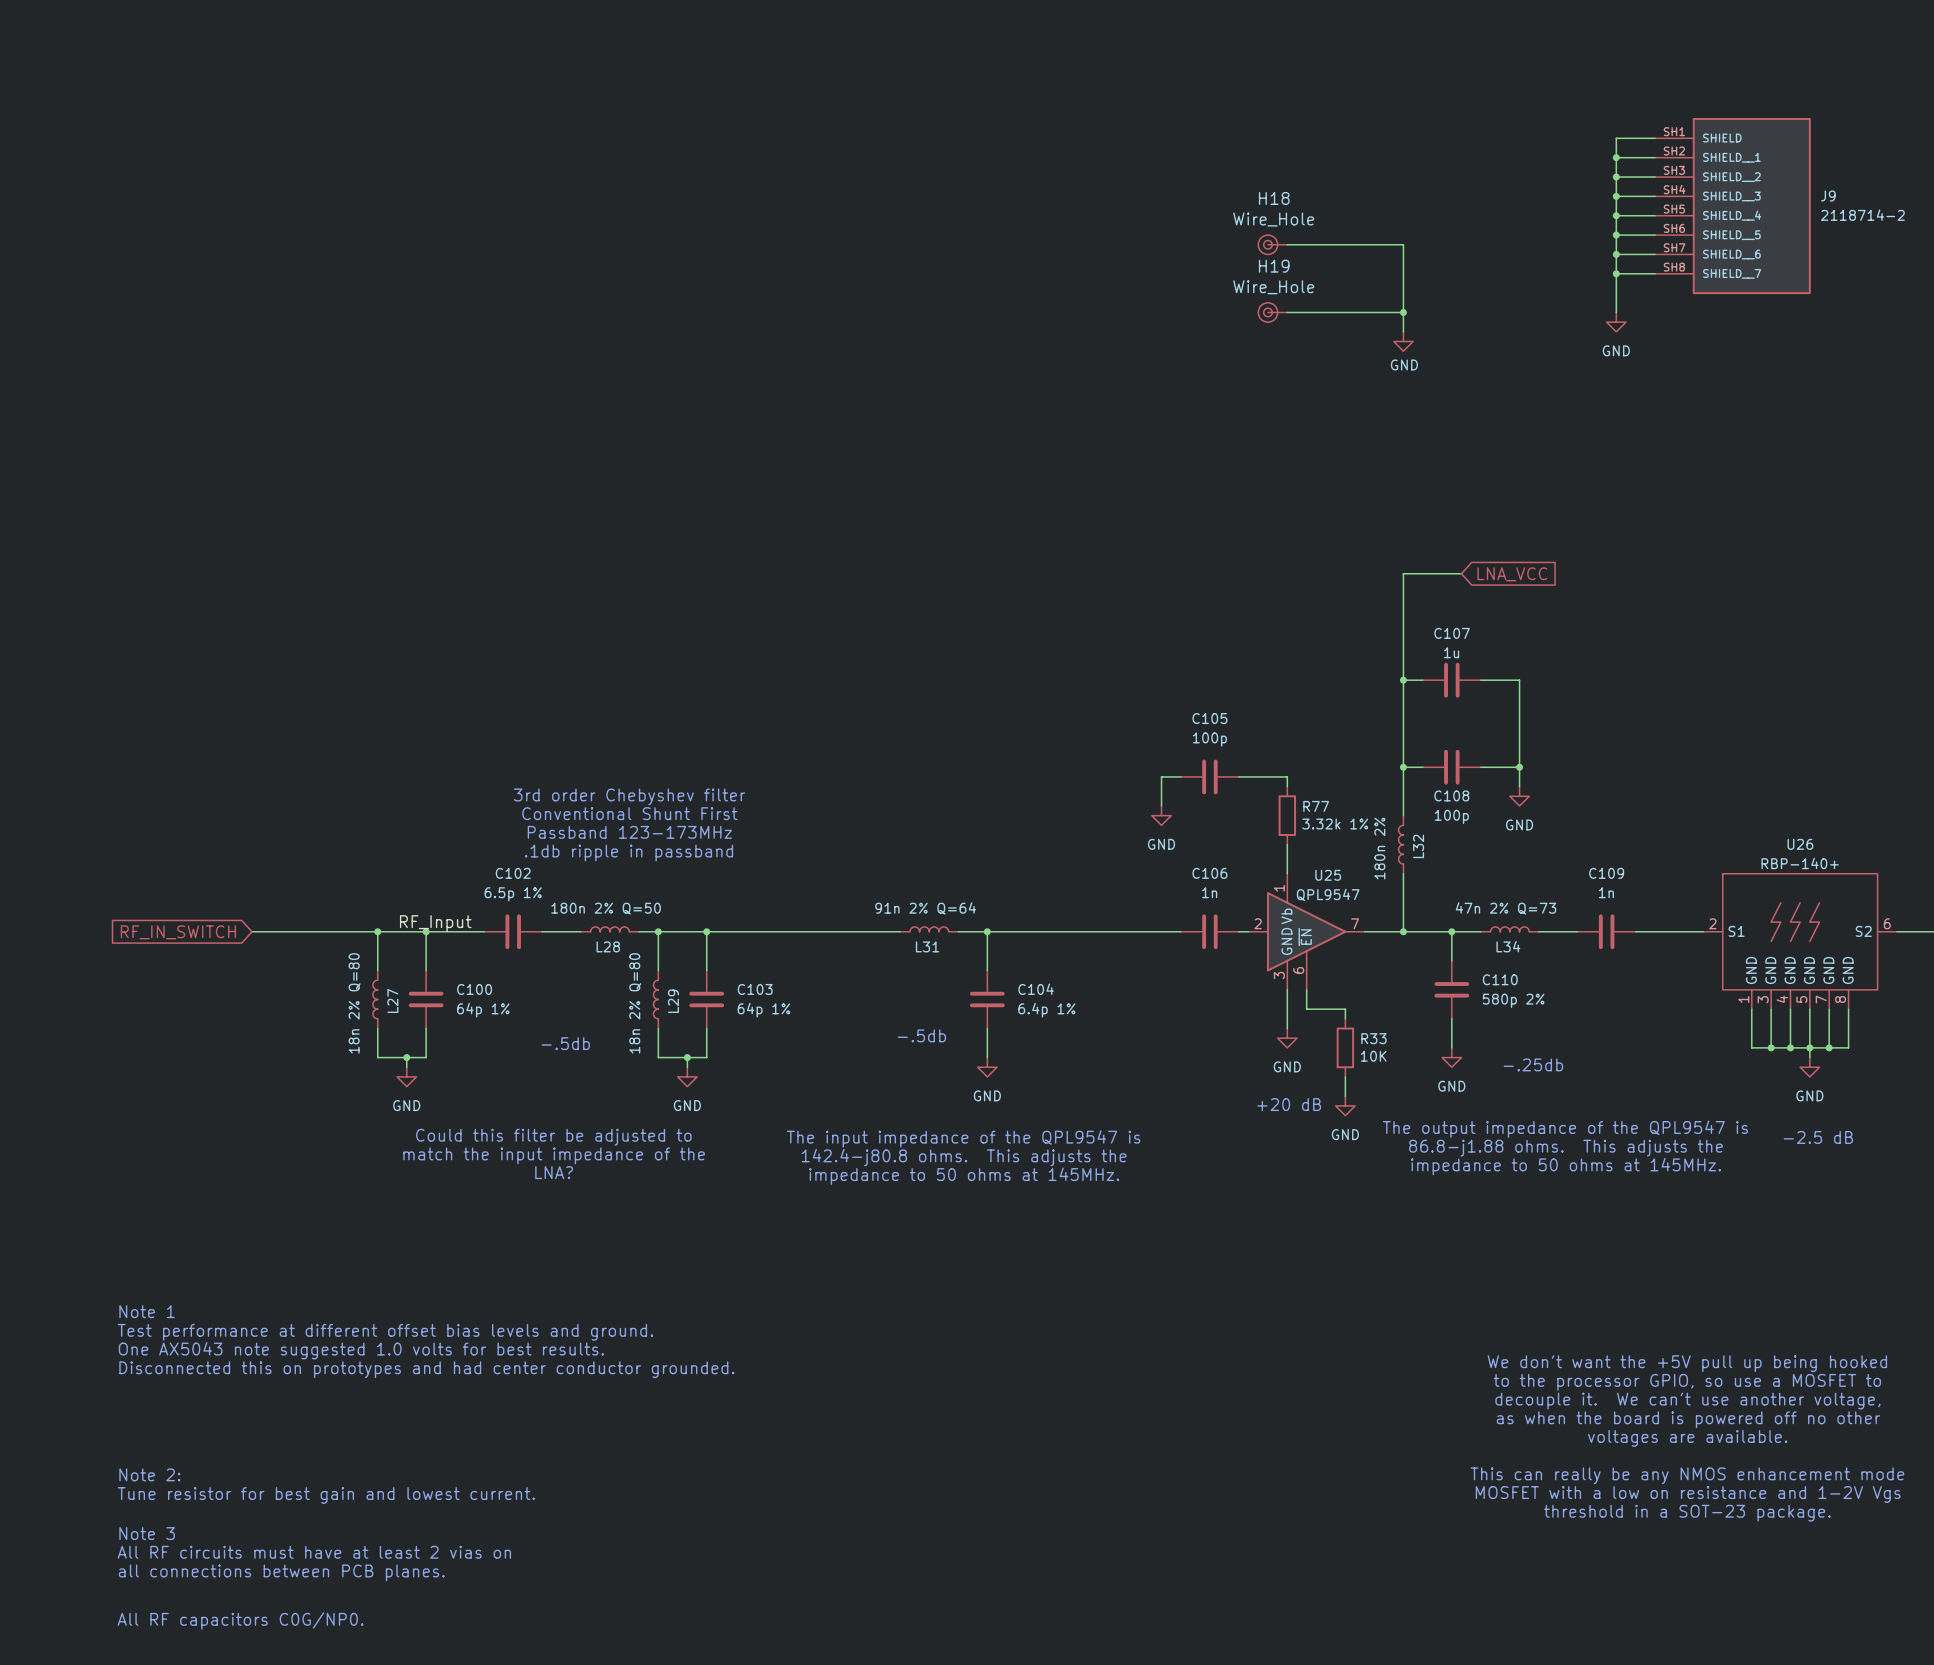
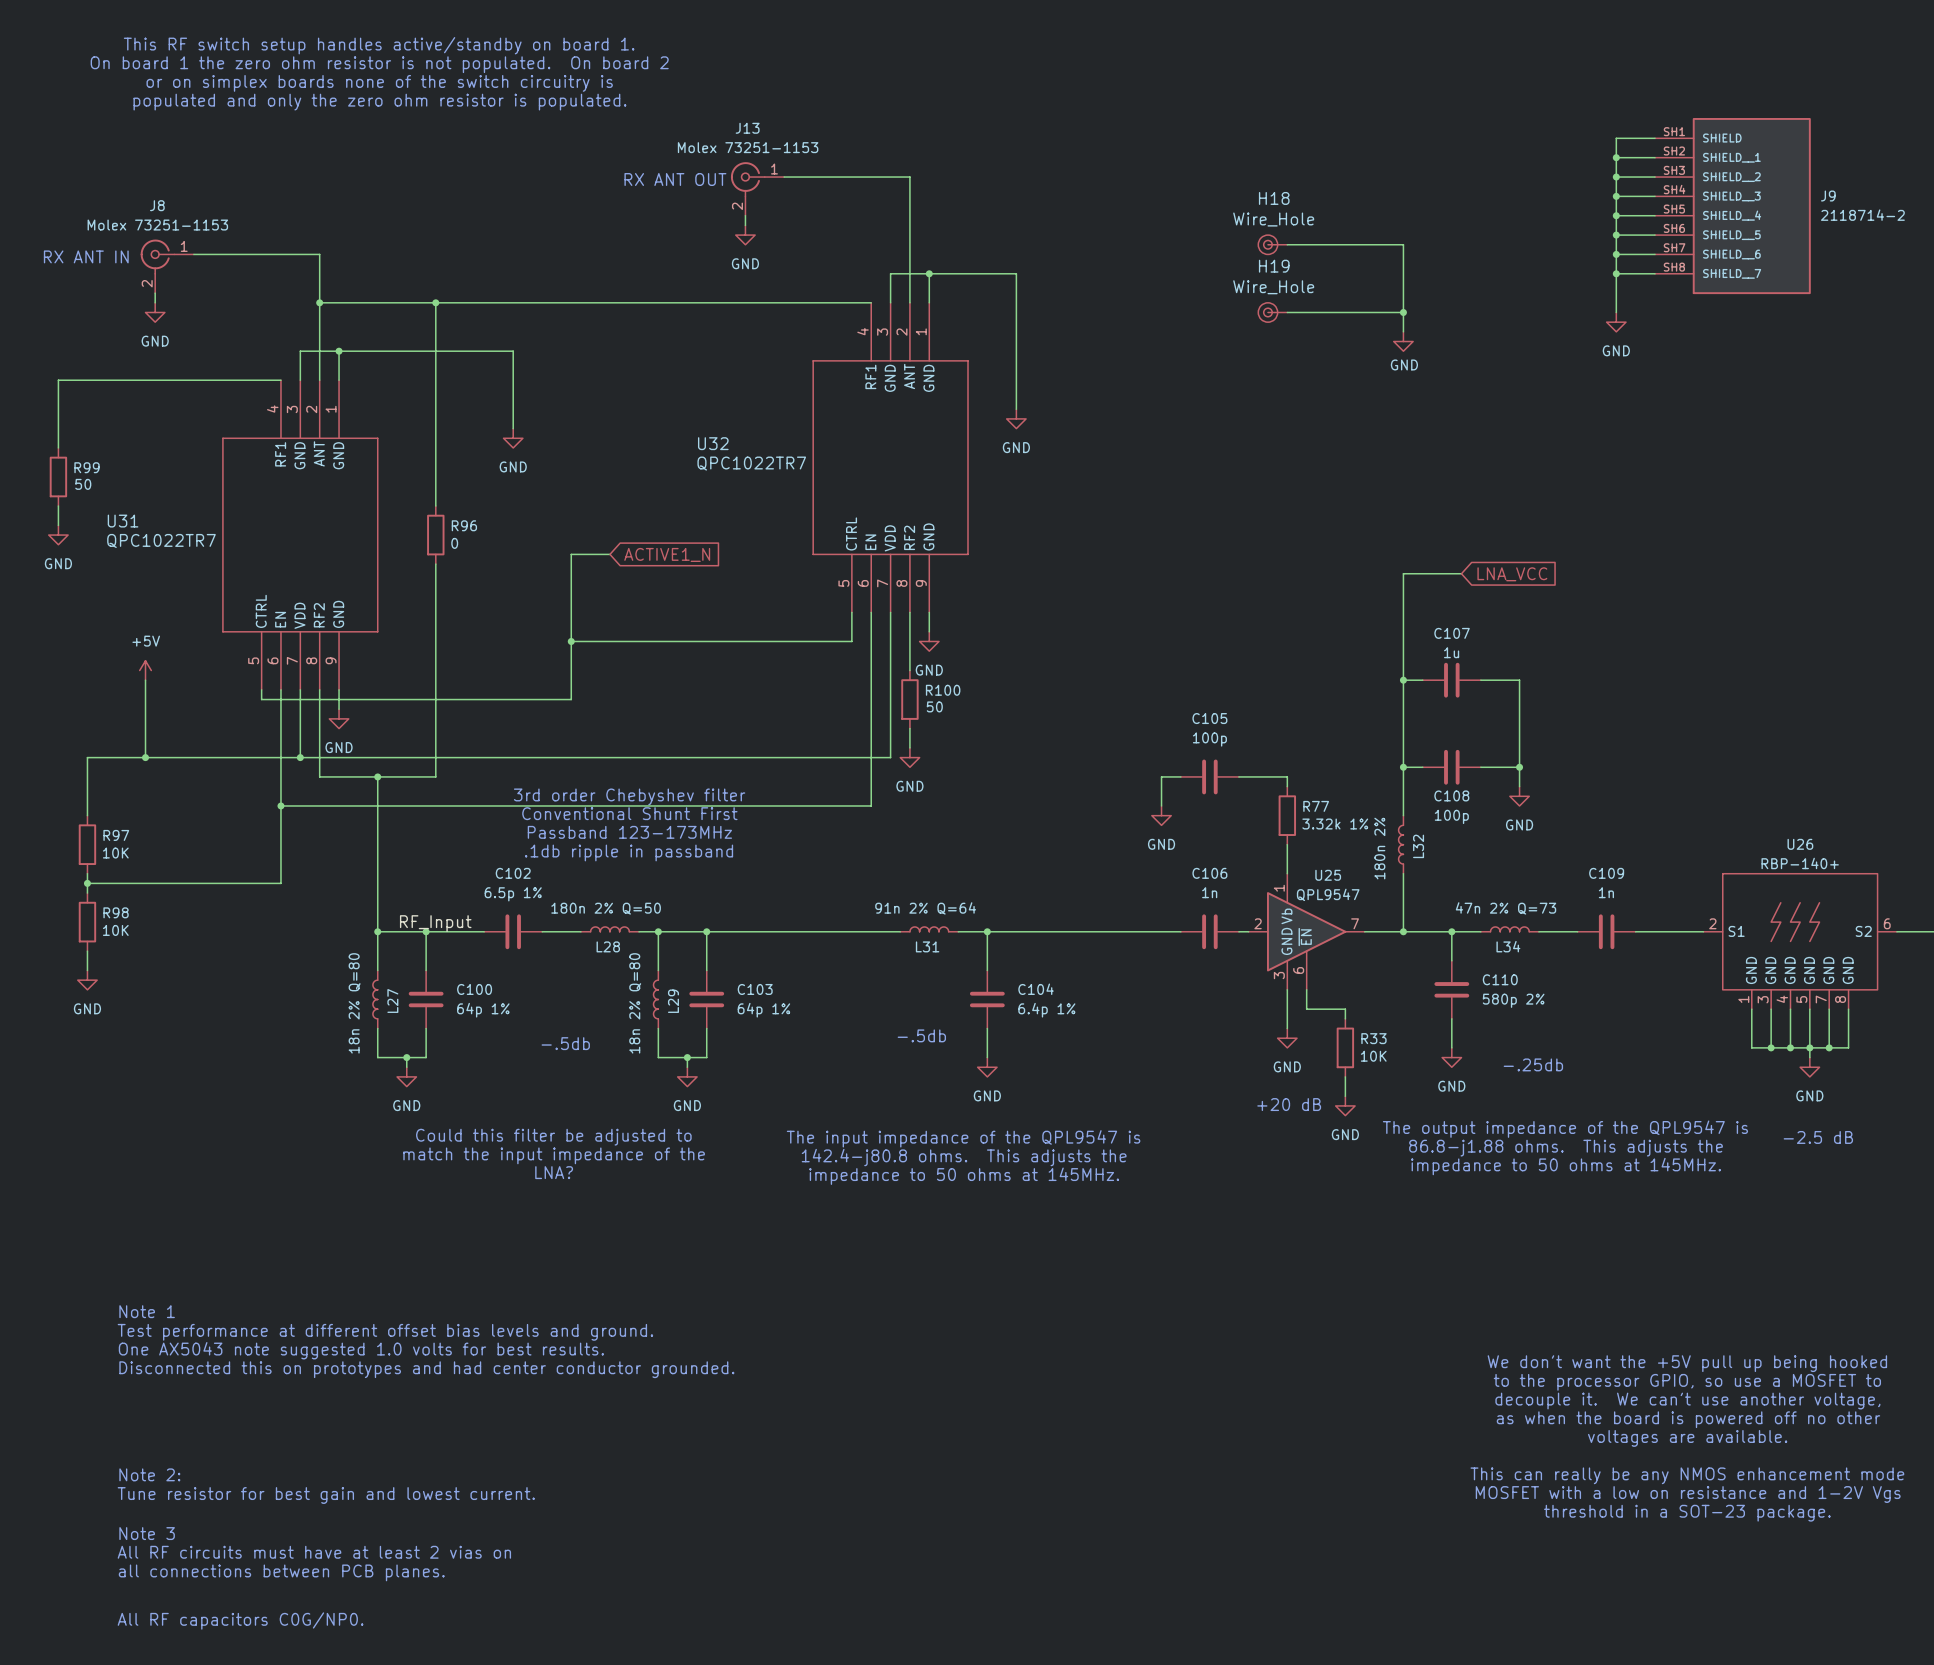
text: none -> This RF switch setup handles active/standby on board 1. (379, 45)
text: none -> On board 1 the zero ohm resistor is not populated. On board 2 (379, 64)
text: none -> or on simplex boards none of the switch circuitry is (379, 83)
text: none -> populated and only the zero ohm resistor is populated. (379, 102)
wire: none -> (784, 177) (909, 177) (909, 302)
text: none -> RX ANT OUT (675, 179)
J13: none -> Molex 73251-1153 (757, 188)
wire: none -> (745, 215) (745, 225)
power symbol: none -> GND (745, 235)
wire: none -> (193, 254) (319, 254) (319, 380)
text: none -> RX ANT IN (86, 256)
J8: none -> Molex 73251-1153 (167, 266)
wire: none -> (929, 273) (929, 302)
junction: none -> (929, 273)
wire: none -> (155, 293) (155, 302)
wire: none -> (319, 302) (871, 302)
junction: none -> (319, 302)
wire: none -> (435, 302) (435, 506)
junction: none -> (435, 302)
wire: none -> (890, 302) (890, 273) (1016, 273) (1016, 409)
power symbol: none -> GND (155, 312)
wire: none -> (339, 351) (339, 380)
junction: none -> (339, 351)
wire: none -> (280, 380) (58, 380) (58, 447)
wire: none -> (300, 380) (300, 351) (513, 351) (513, 428)
power symbol: none -> GND (1016, 418)
power symbol: none -> GND (513, 438)
U32: none -> QPC1022TR7 (890, 457)
R99: none -> 50 (58, 476)
wire: none -> (58, 506) (58, 525)
power symbol: none -> GND (58, 535)
U31: none -> QPC1022TR7 (300, 535)
R96: none -> 0 (435, 535)
wire: none -> (609, 554) (571, 554) (571, 699) (261, 699) (261, 689)
global label: none -> ACTIVE1_N (667, 554)
wire: none -> (435, 564) (435, 776) (319, 776) (319, 689)
wire: none -> (851, 612) (851, 641) (571, 641)
wire: none -> (871, 612) (871, 805) (280, 805)
wire: none -> (890, 612) (890, 757) (87, 757) (87, 815)
wire: none -> (909, 612) (909, 670)
wire: none -> (929, 612) (929, 631)
junction: none -> (571, 641)
power symbol: none -> GND (929, 641)
power symbol: none -> +5V (145, 670)
wire: none -> (145, 680) (145, 757)
wire: none -> (280, 689) (280, 883) (87, 883)
wire: none -> (300, 689) (300, 757)
wire: none -> (339, 689) (339, 709)
R100: none -> 50 (909, 699)
power symbol: none -> GND (339, 718)
wire: none -> (909, 728) (909, 747)
junction: none -> (145, 757)
junction: none -> (300, 757)
power symbol: none -> GND (909, 757)
junction: none -> (377, 776)
junction: none -> (280, 805)
R97: none -> 10K (87, 844)
wire: none -> (87, 873) (87, 893)
junction: none -> (87, 883)
R98: none -> 10K (87, 922)
wire: (251, 931) (377, 931) -> (377, 776) (377, 931)
global label: RF_IN_SWITCH (178, 932) -> none
wire: none -> (87, 951) (87, 970)
power symbol: none -> GND (87, 980)

